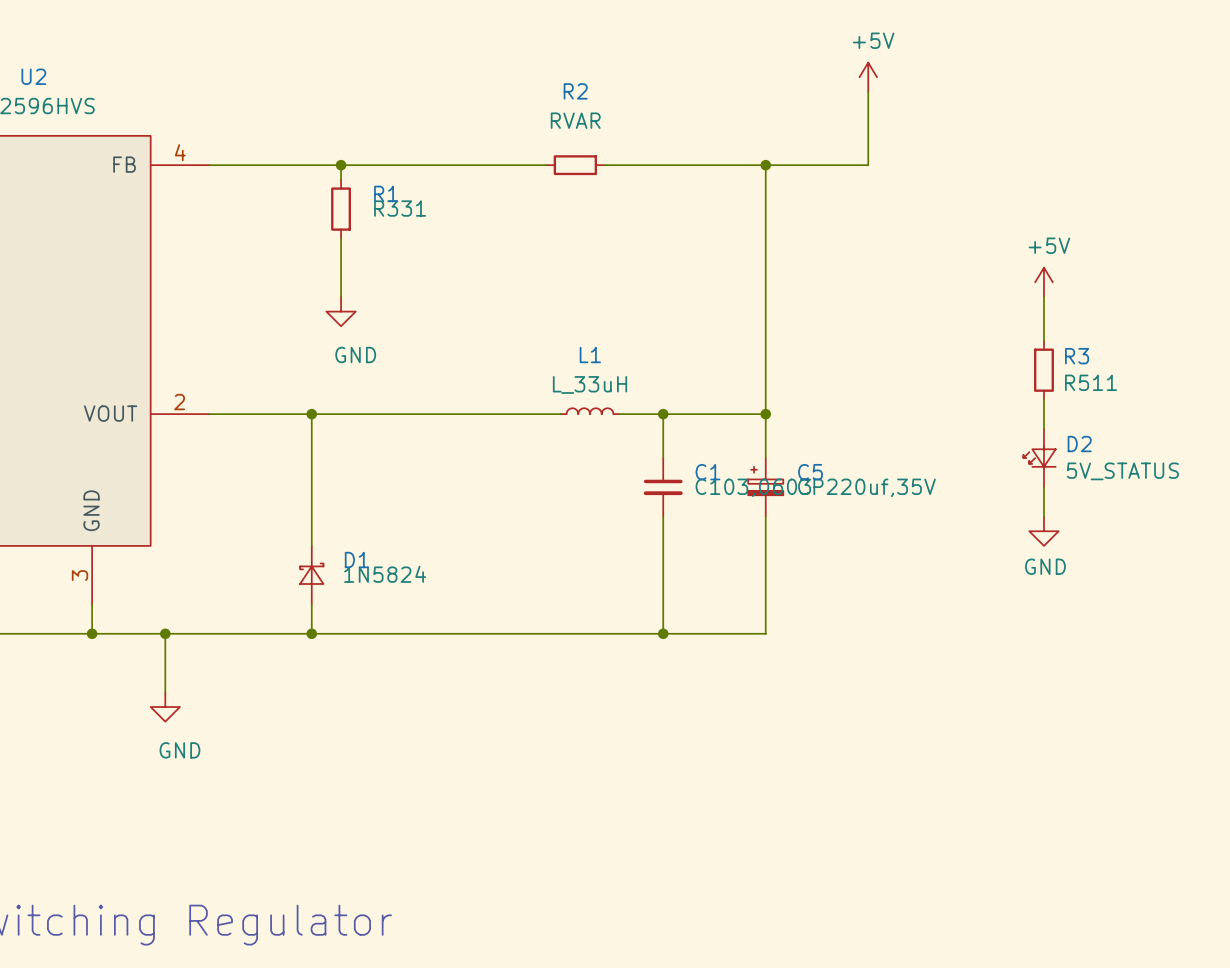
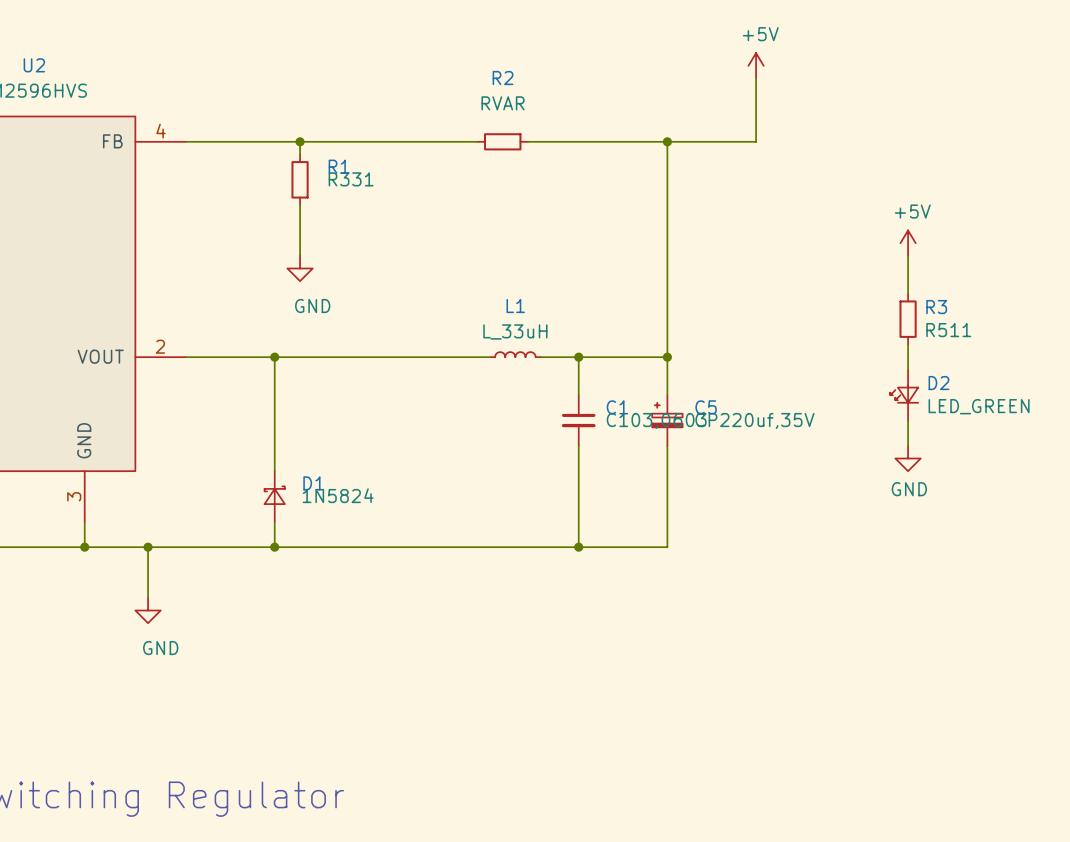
D2 value: 5V_STATUS (1122, 471) -> LED_GREEN (979, 406)

